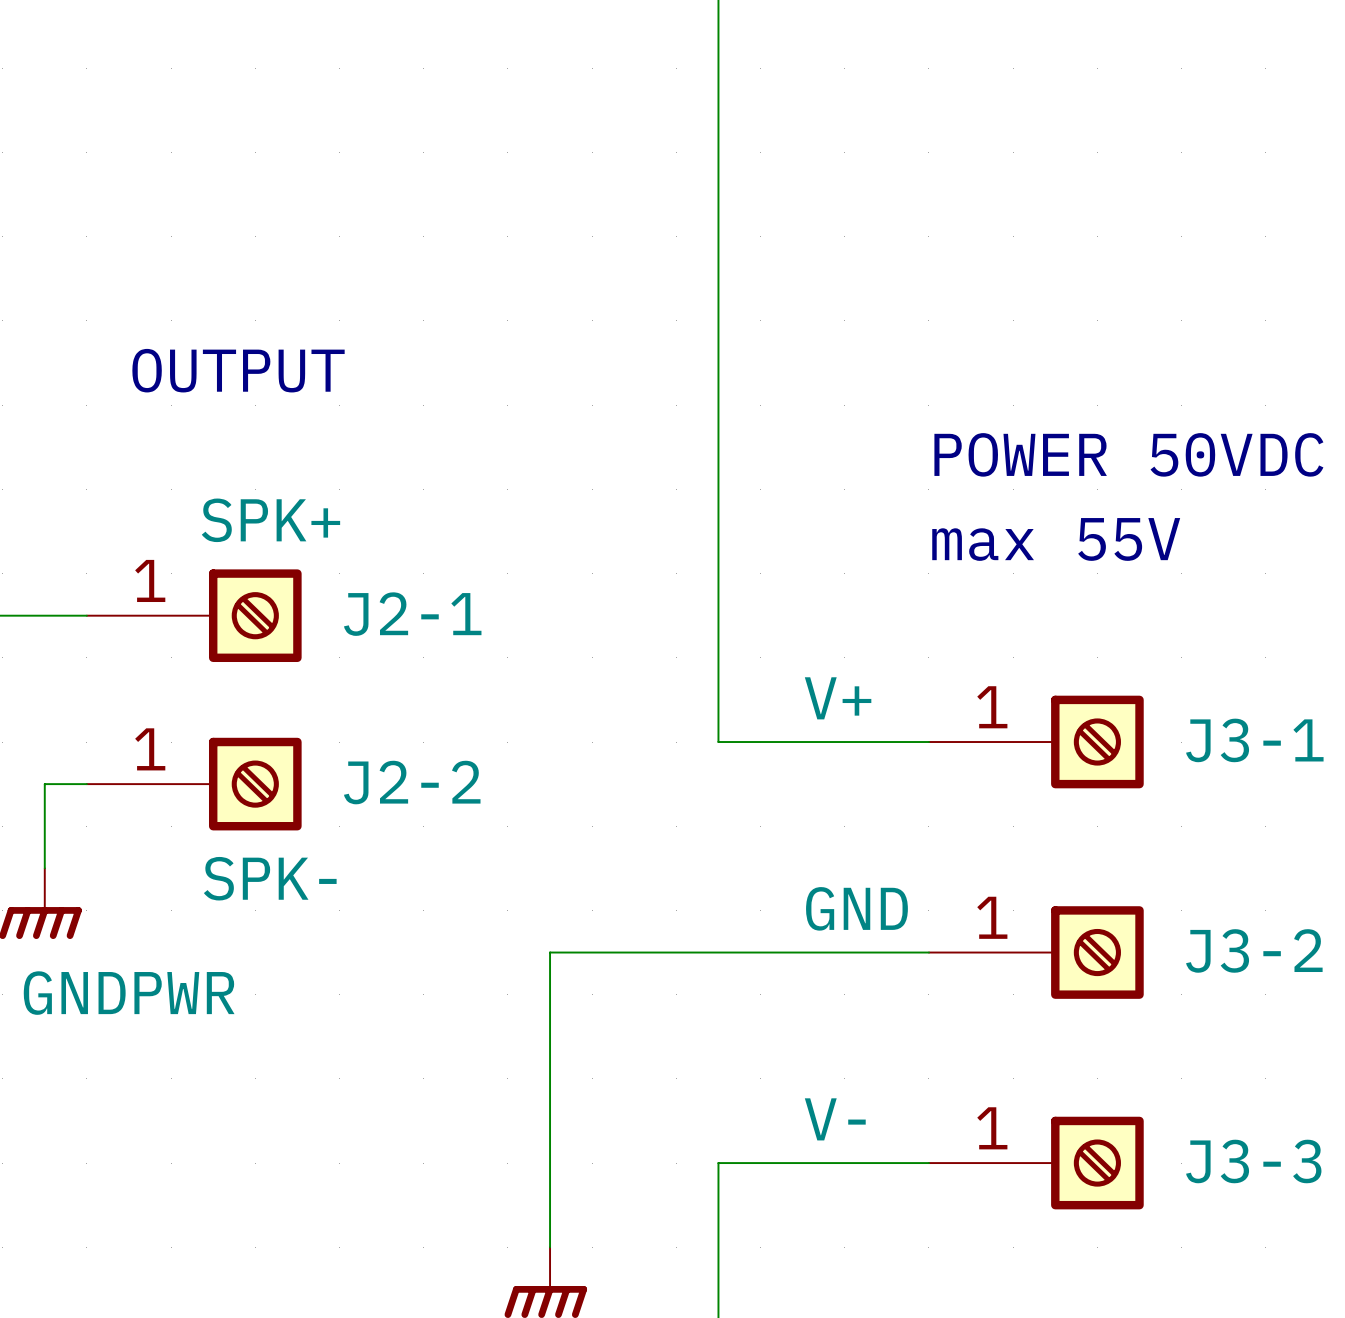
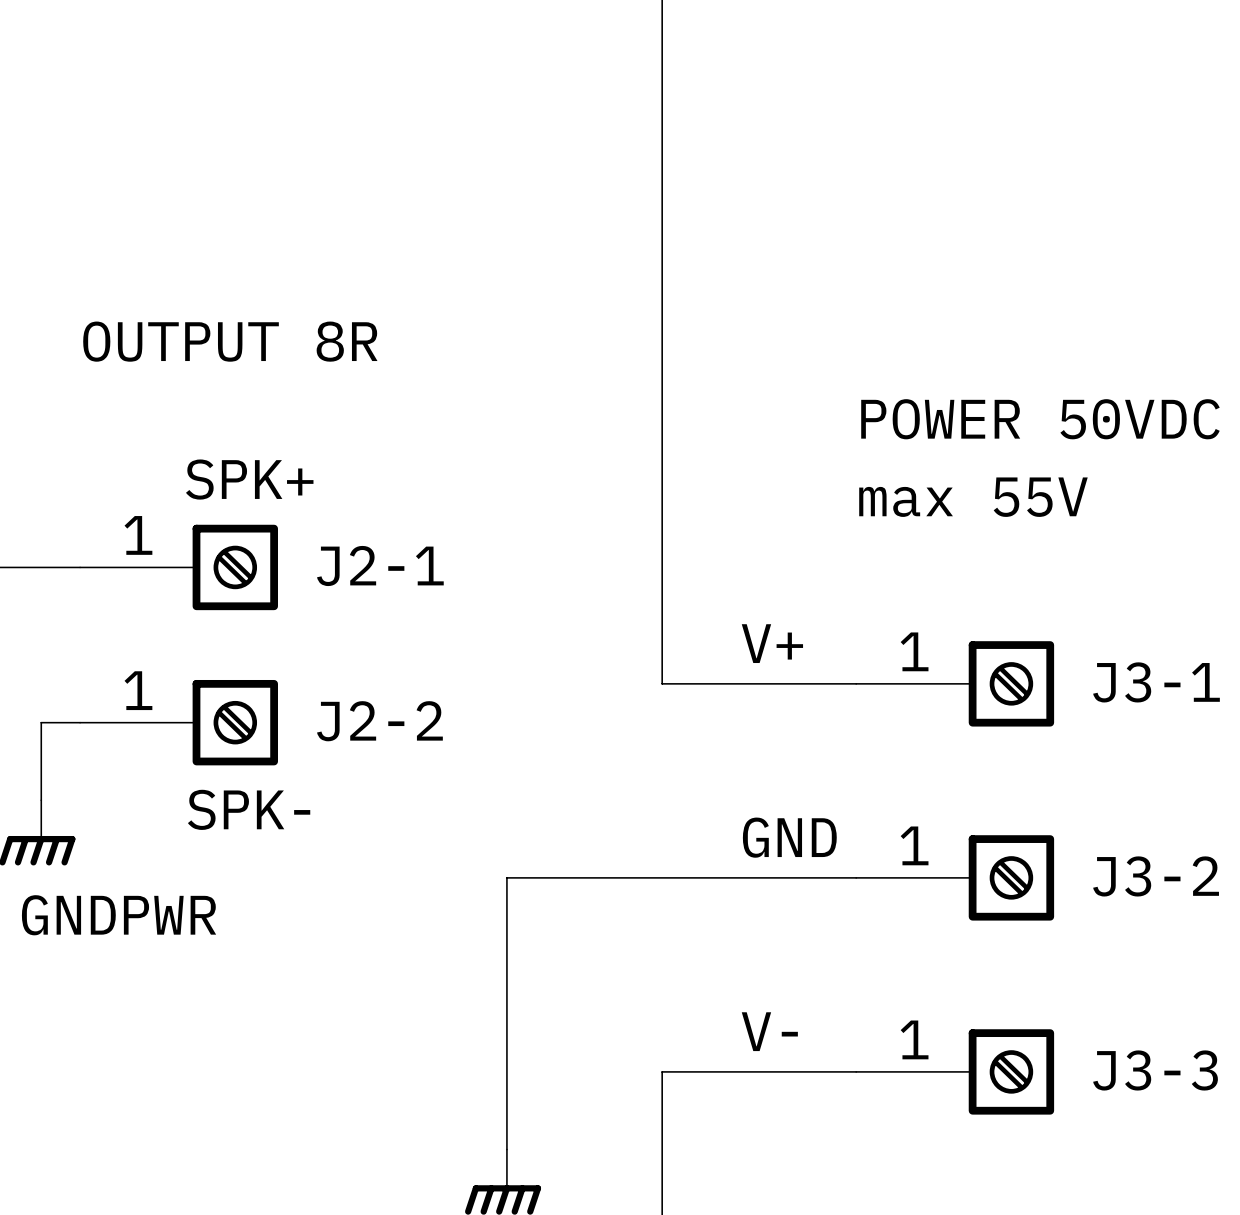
text: OUTPUT (238, 370) -> OUTPUT 8R (230, 341)

